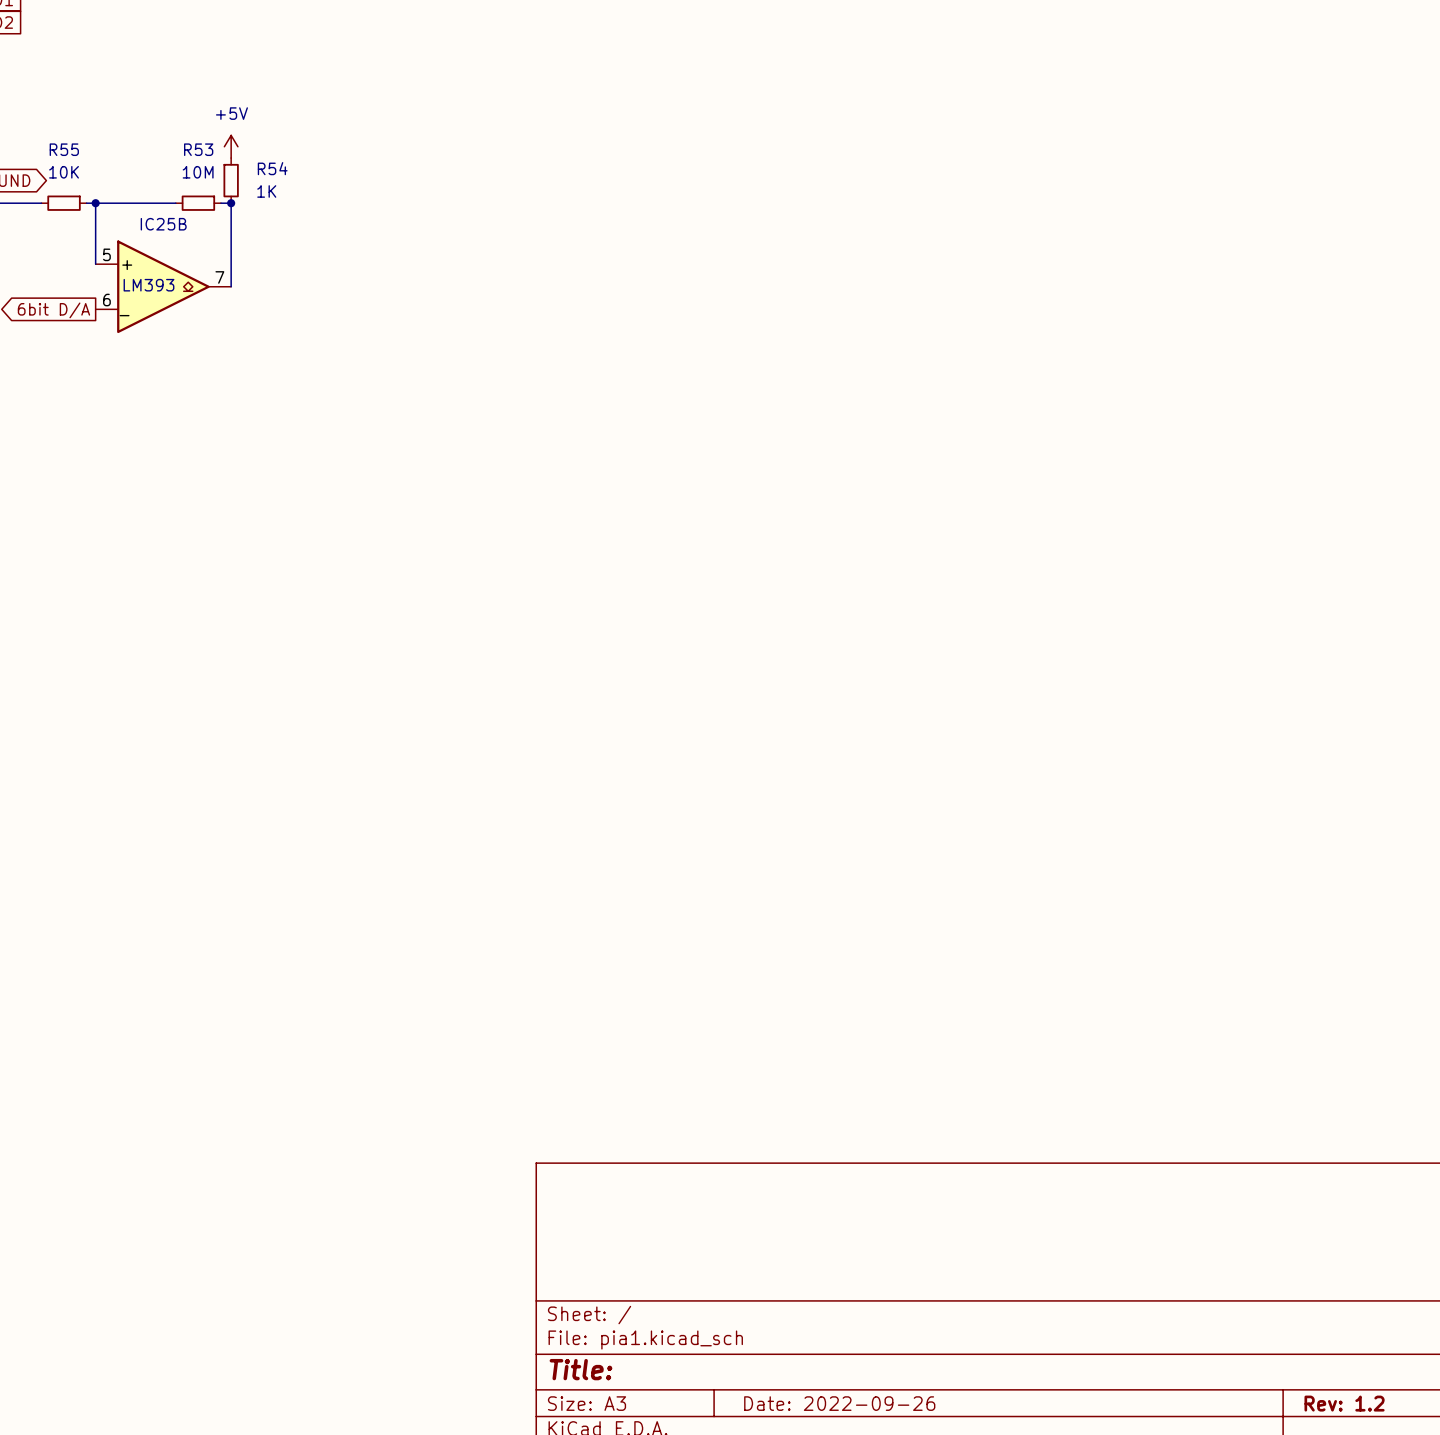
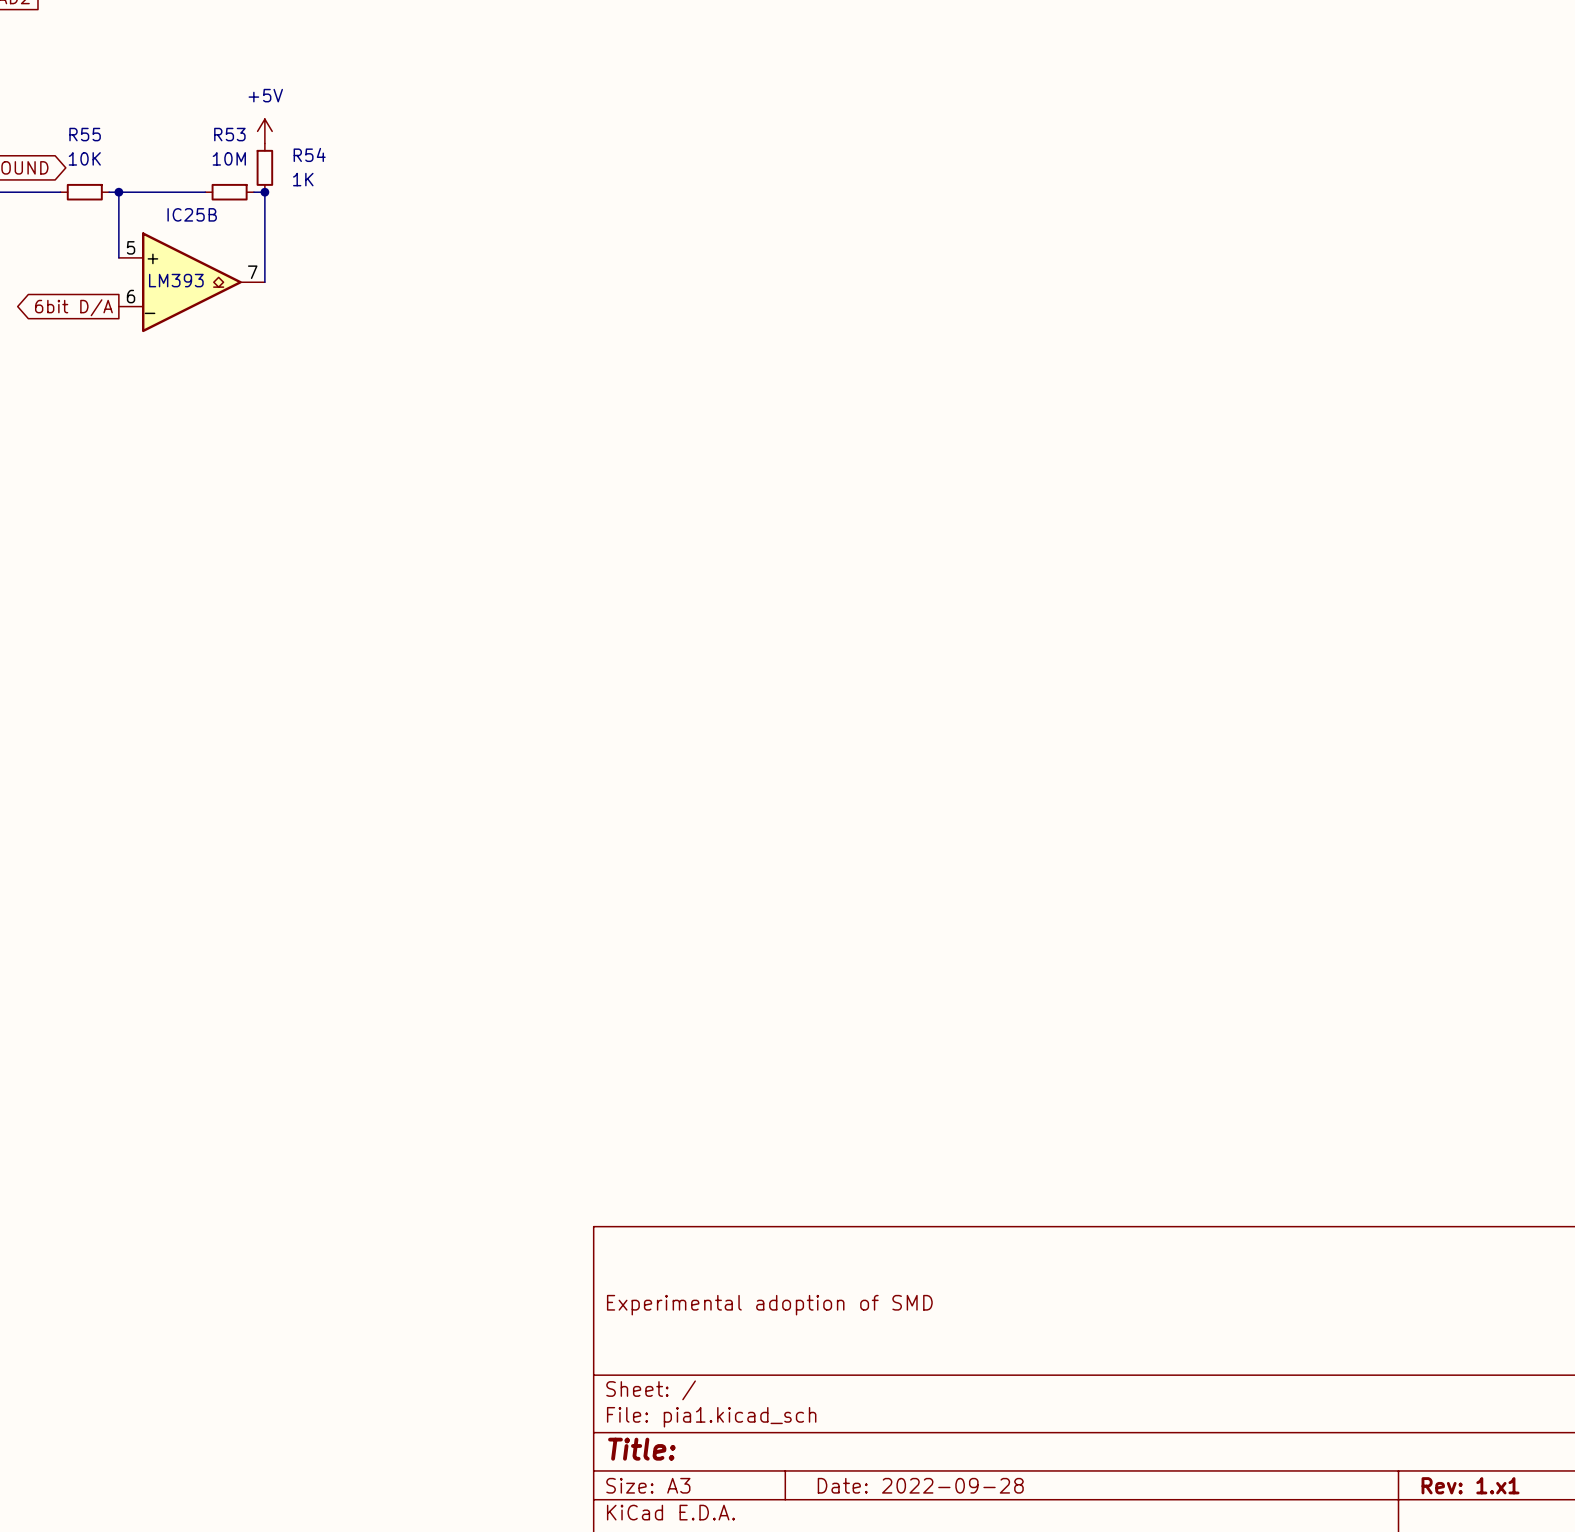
title block: none -> Experimental adoption of SMD (769, 1305)
title block: Date: 2022-09-26 (839, 1403) -> Date: 2022-09-28 (920, 1485)
title block: Rev: 1.2 (1344, 1403) -> Rev: 1.x1 (1470, 1485)

